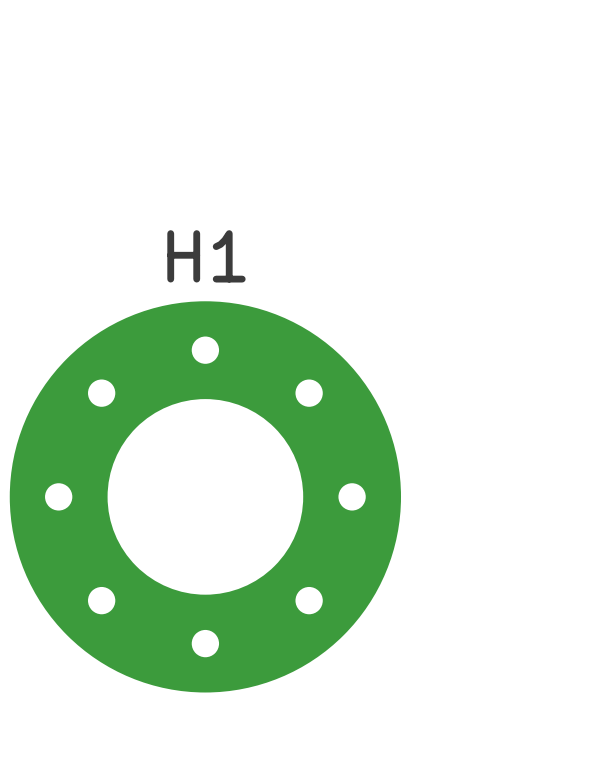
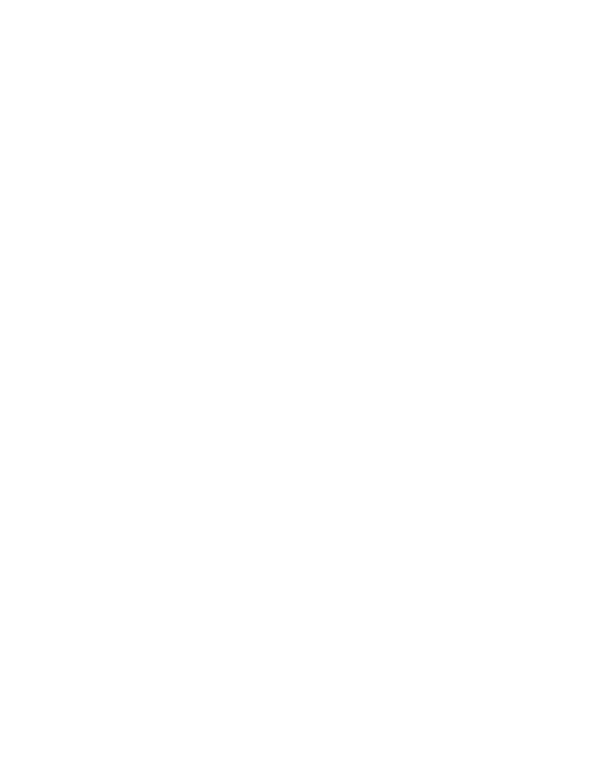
H1: (205, 496) -> none

